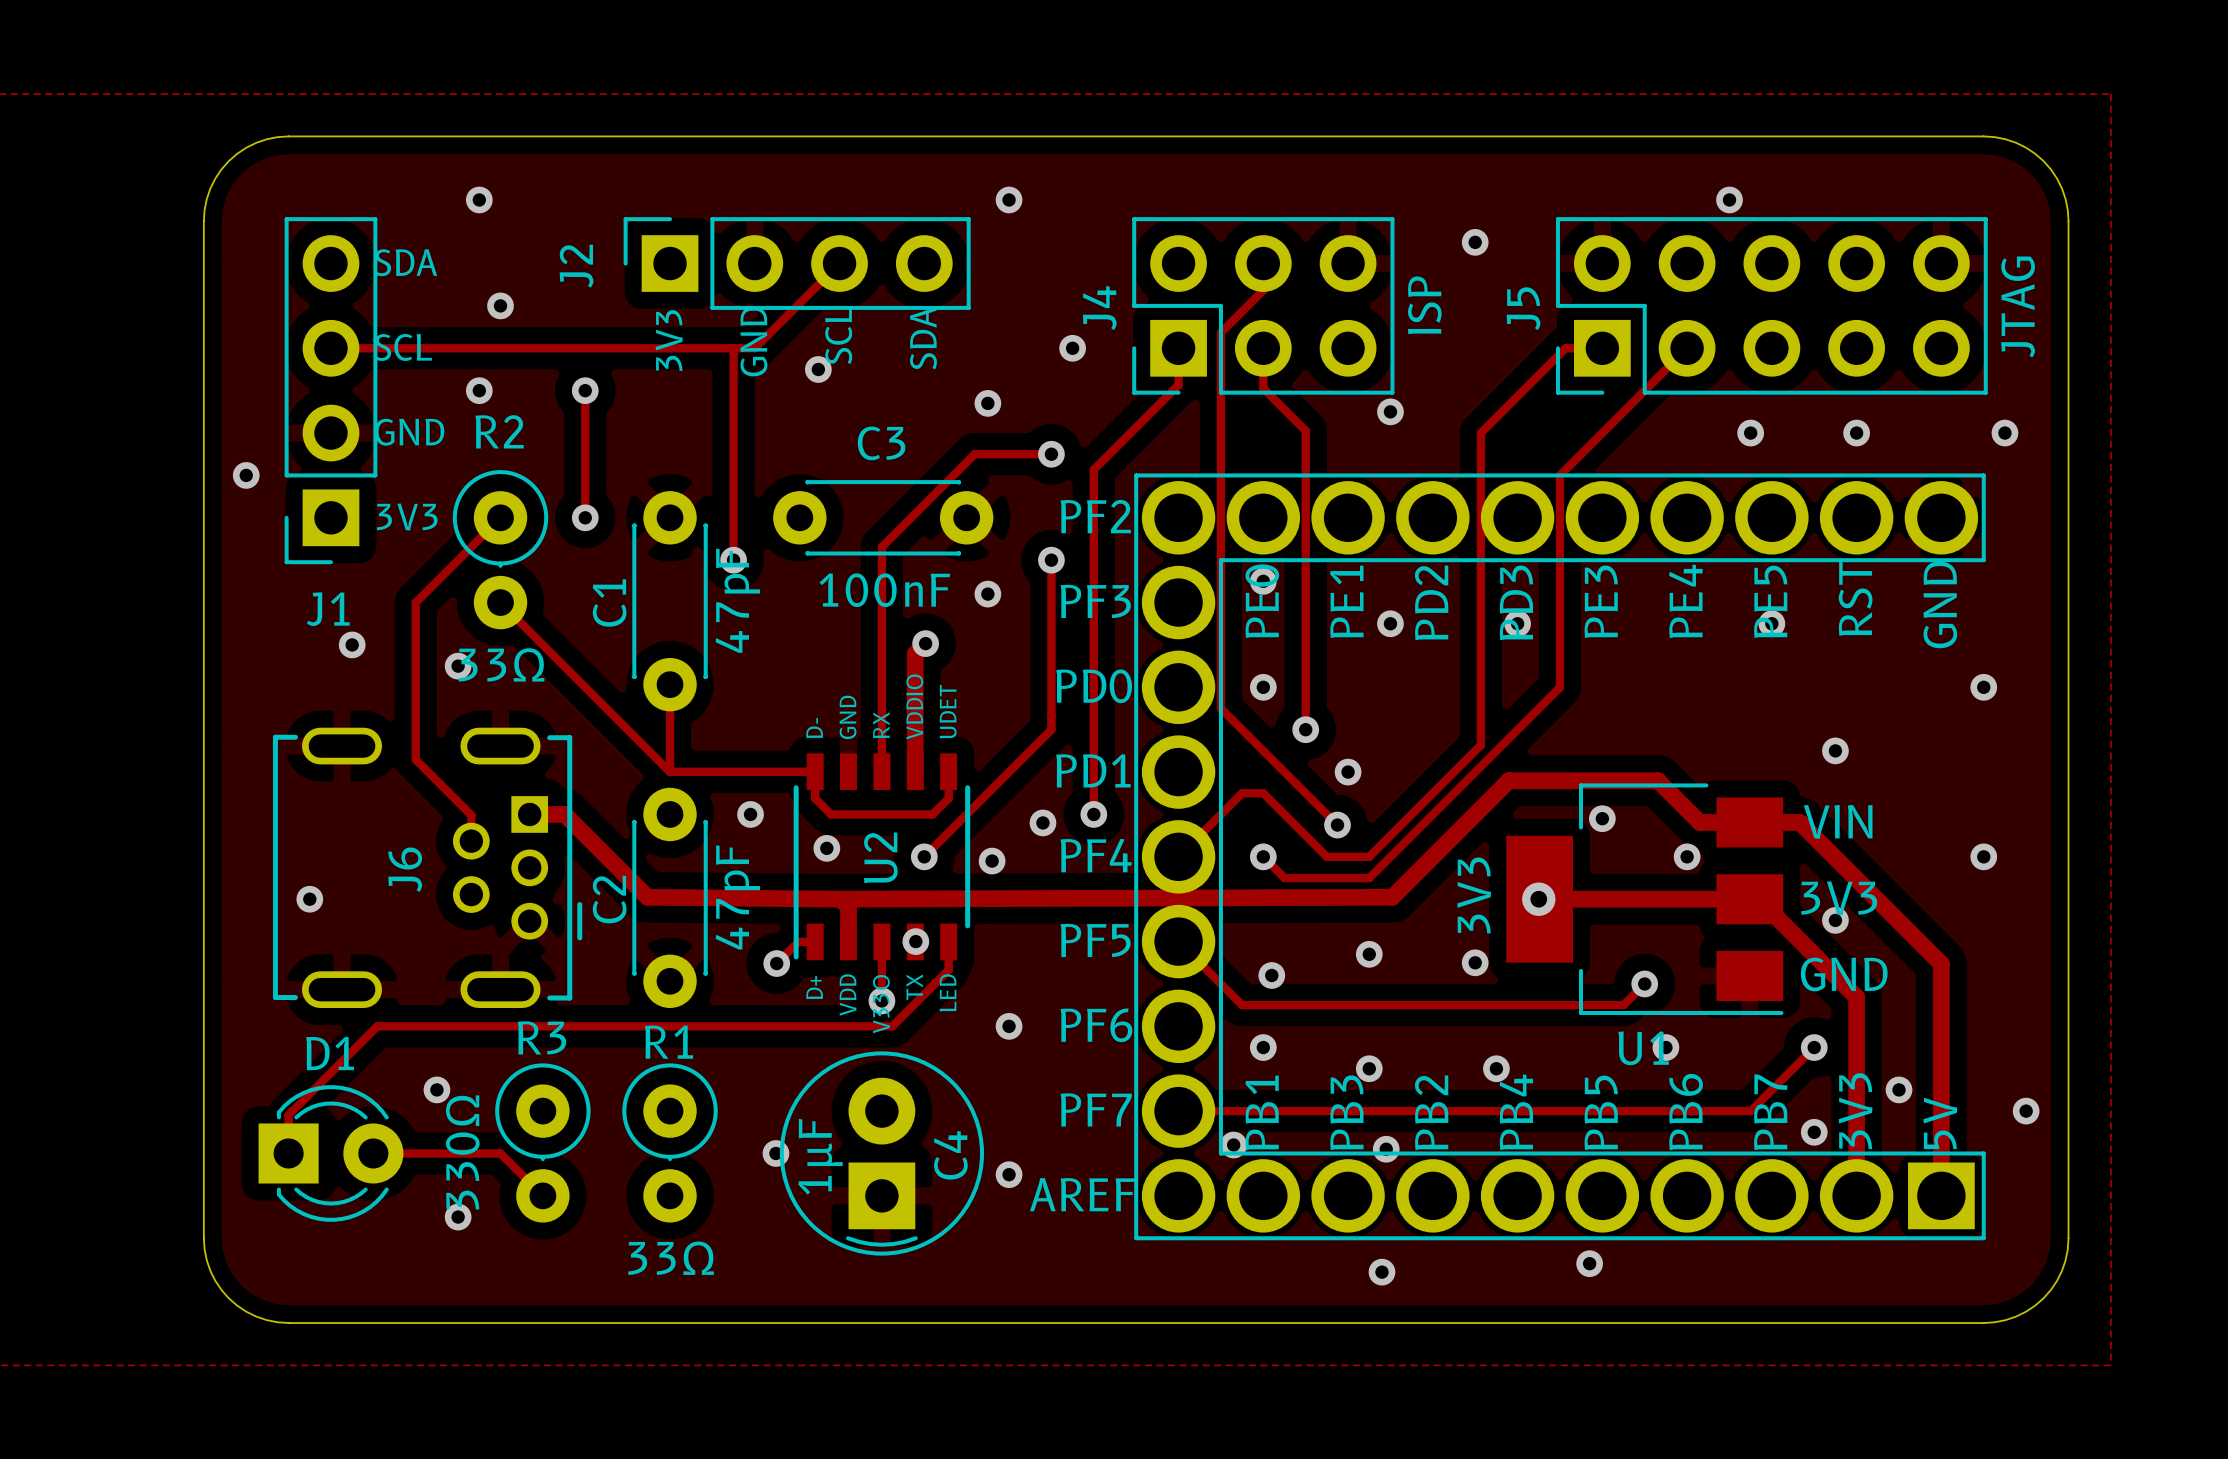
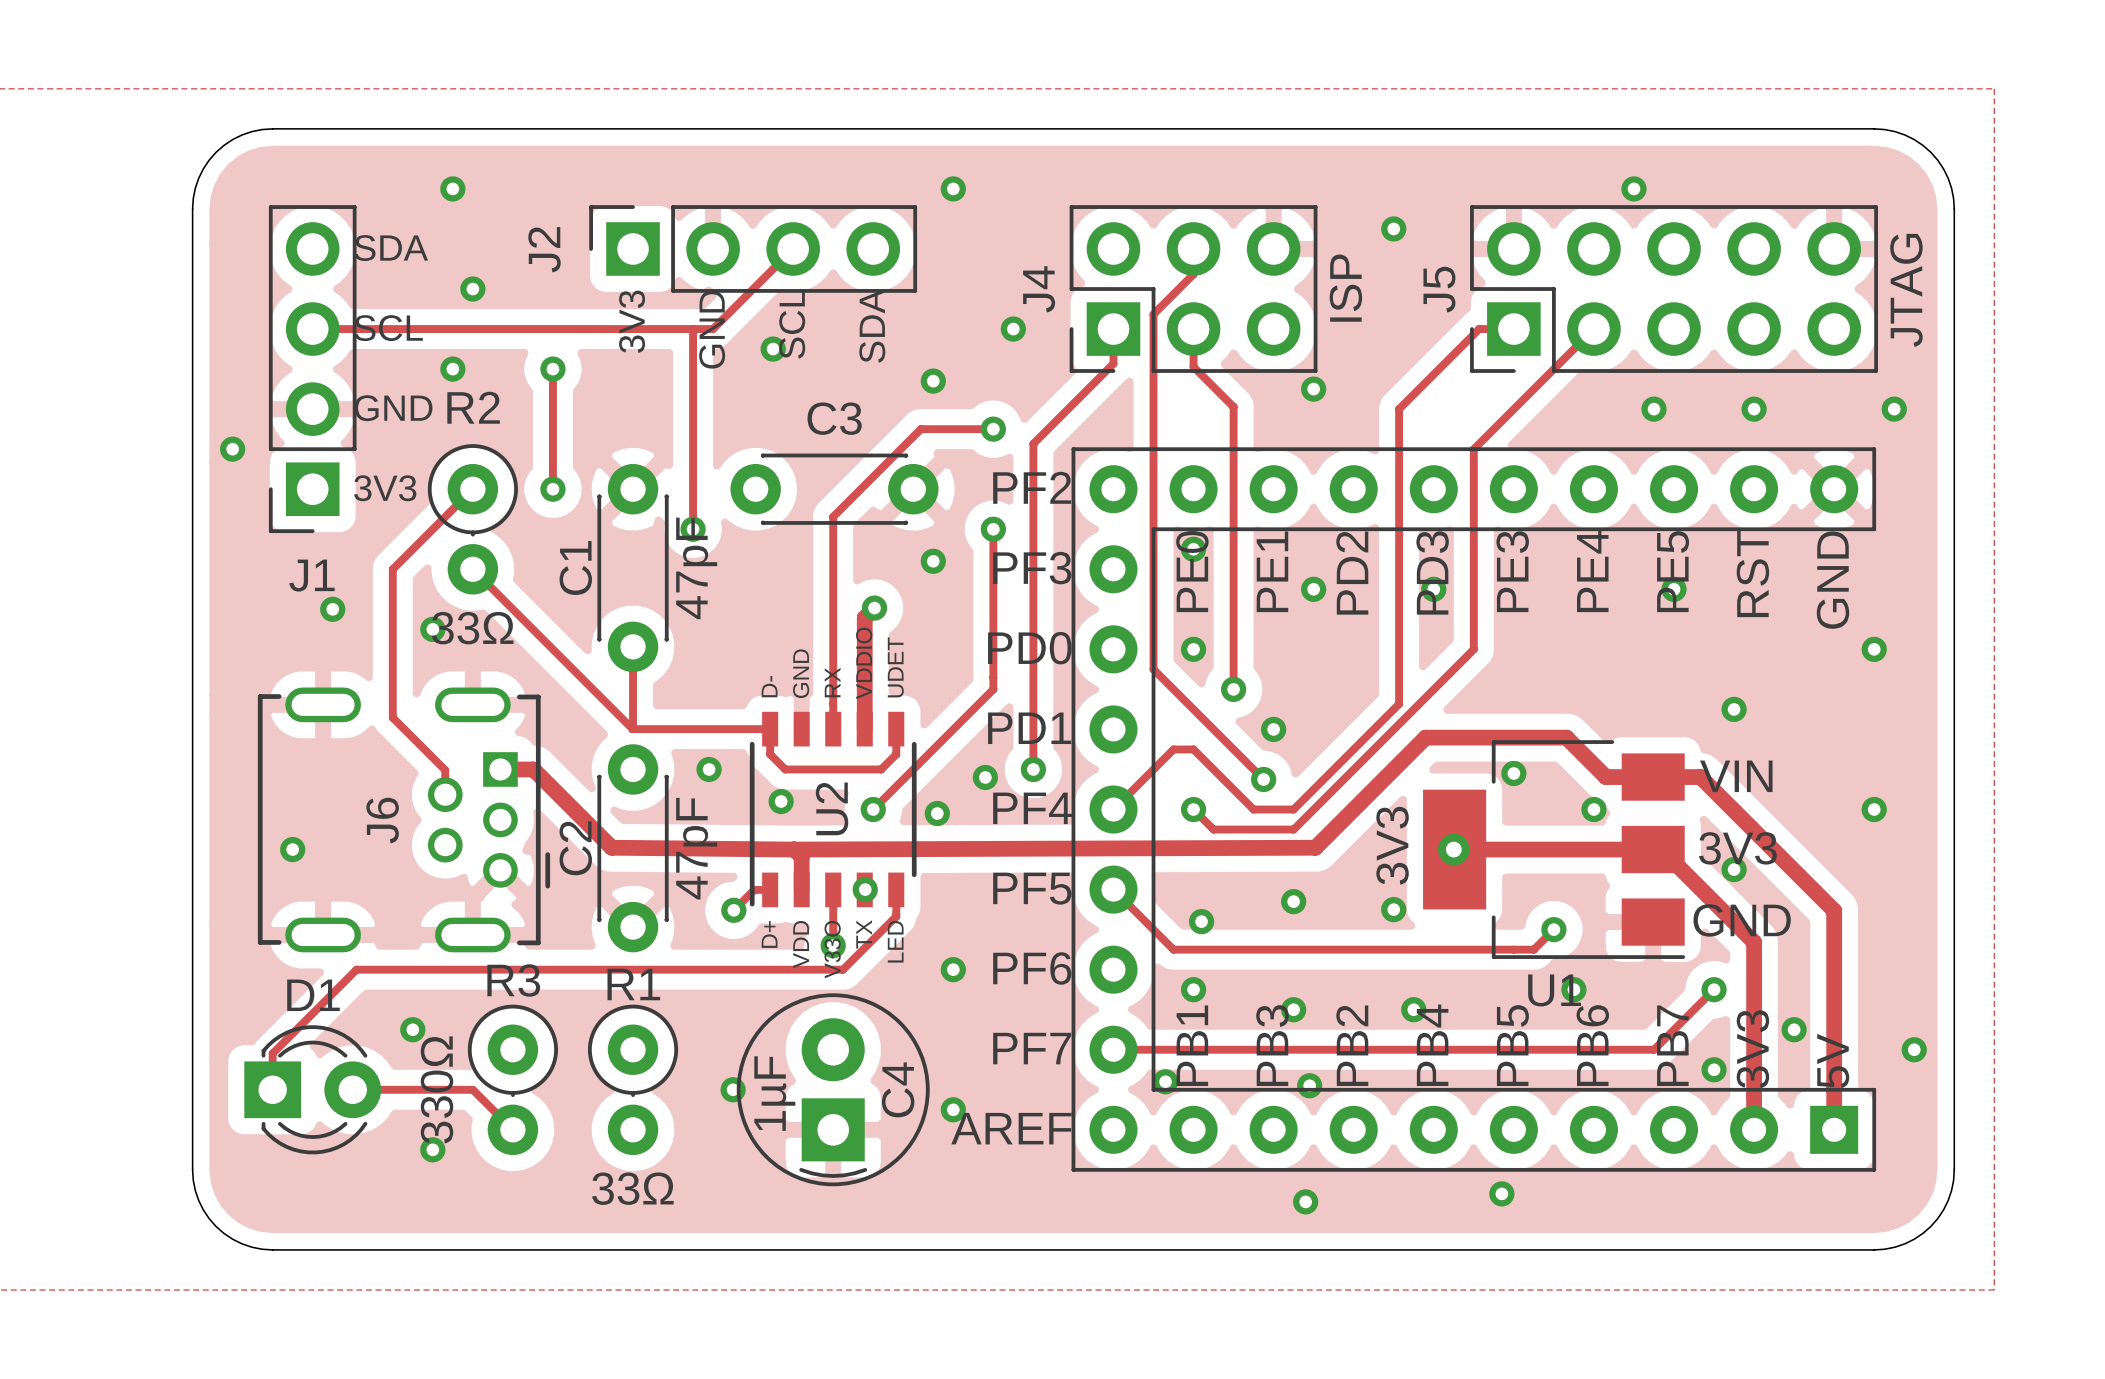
part footprint: [1134, 473, 1986, 1241] -> [1071, 447, 1877, 1172]
C3 value: 100nF (884, 590) -> none

